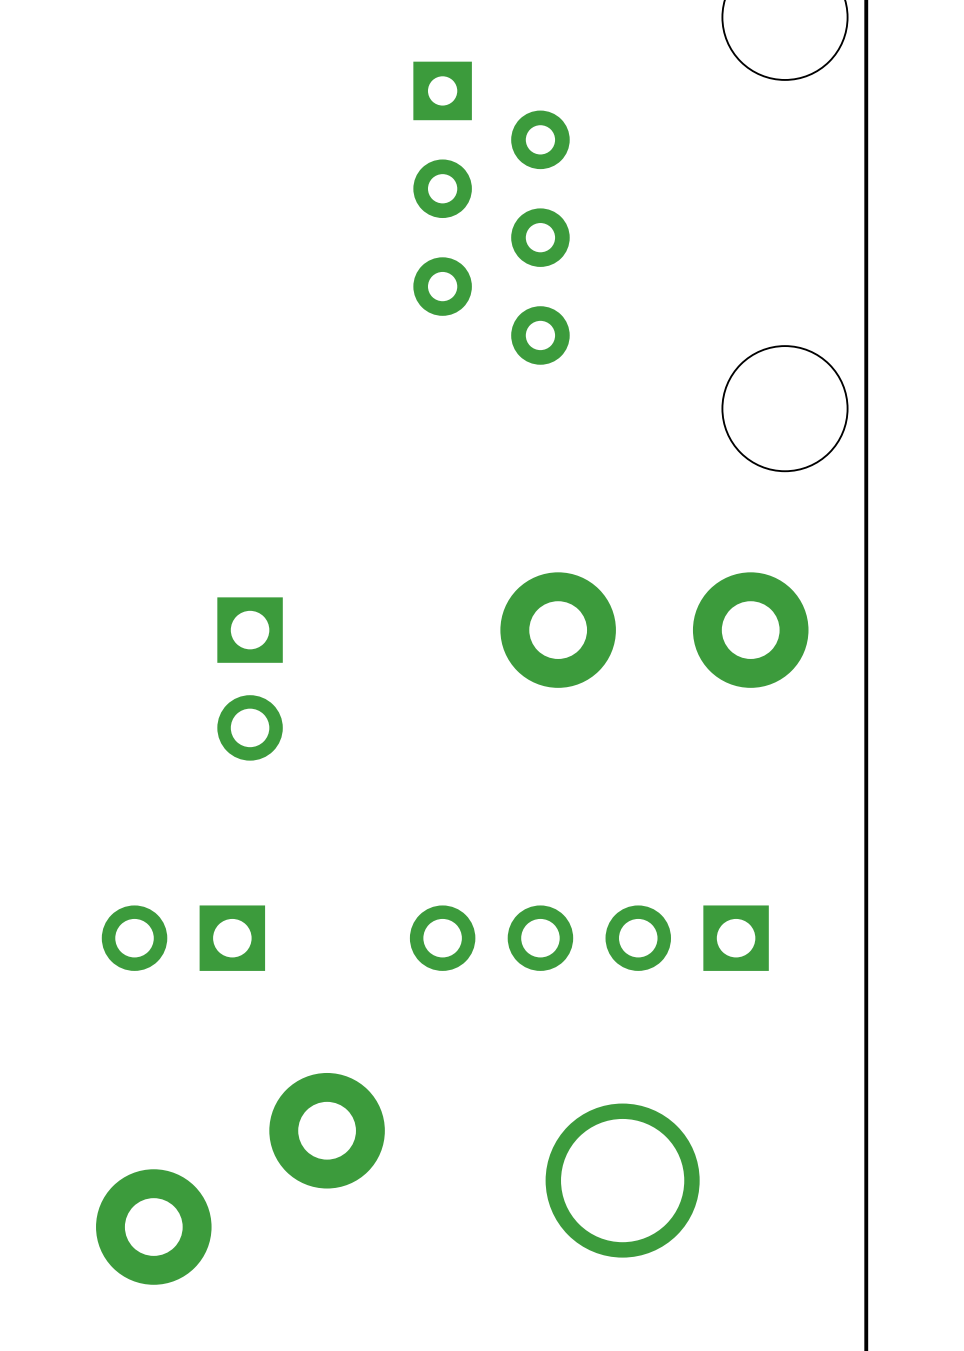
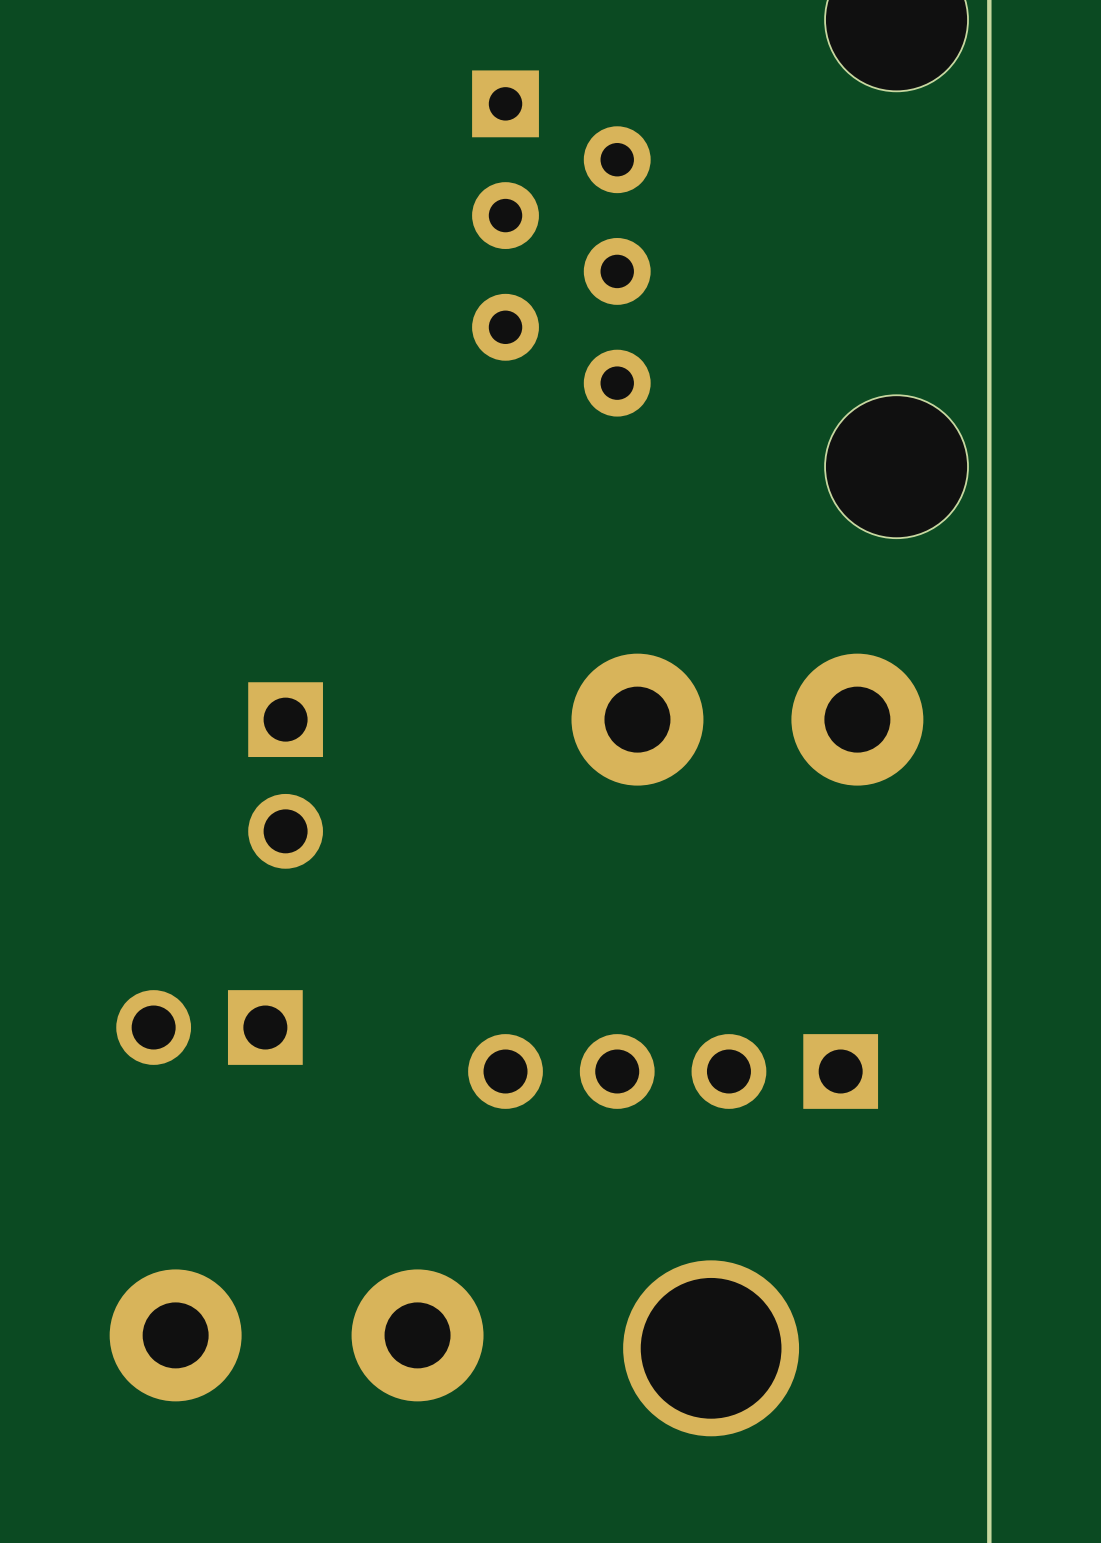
part position: (183, 938) -> (209, 1027)
part position: (327, 1130) -> (417, 1335)
part position: (153, 1227) -> (175, 1335)

